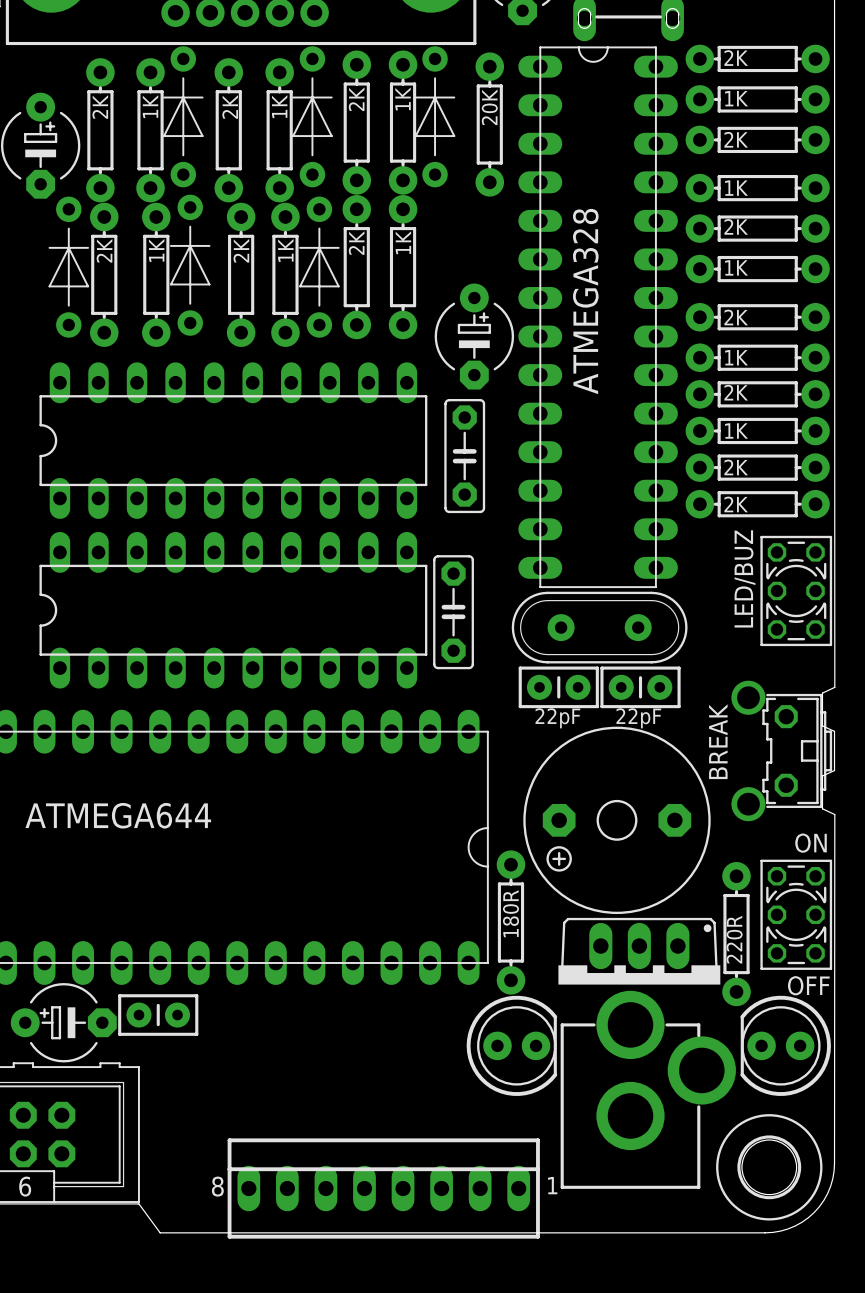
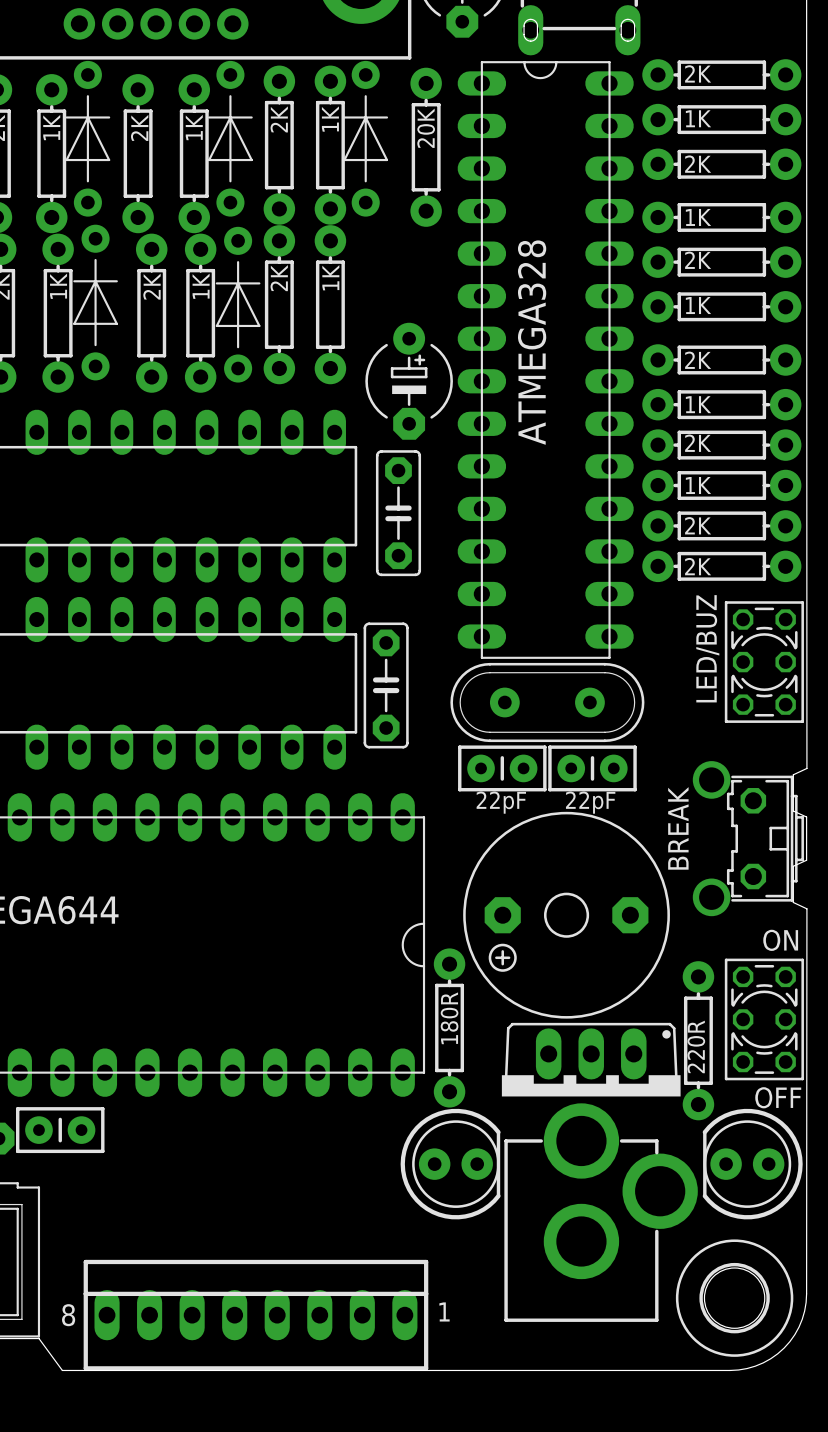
text position: 1 (552, 1185) -> 1 (444, 1311)
text position: 8 (217, 1186) -> 8 (68, 1315)
part position: (383, 1188) -> (255, 1315)

